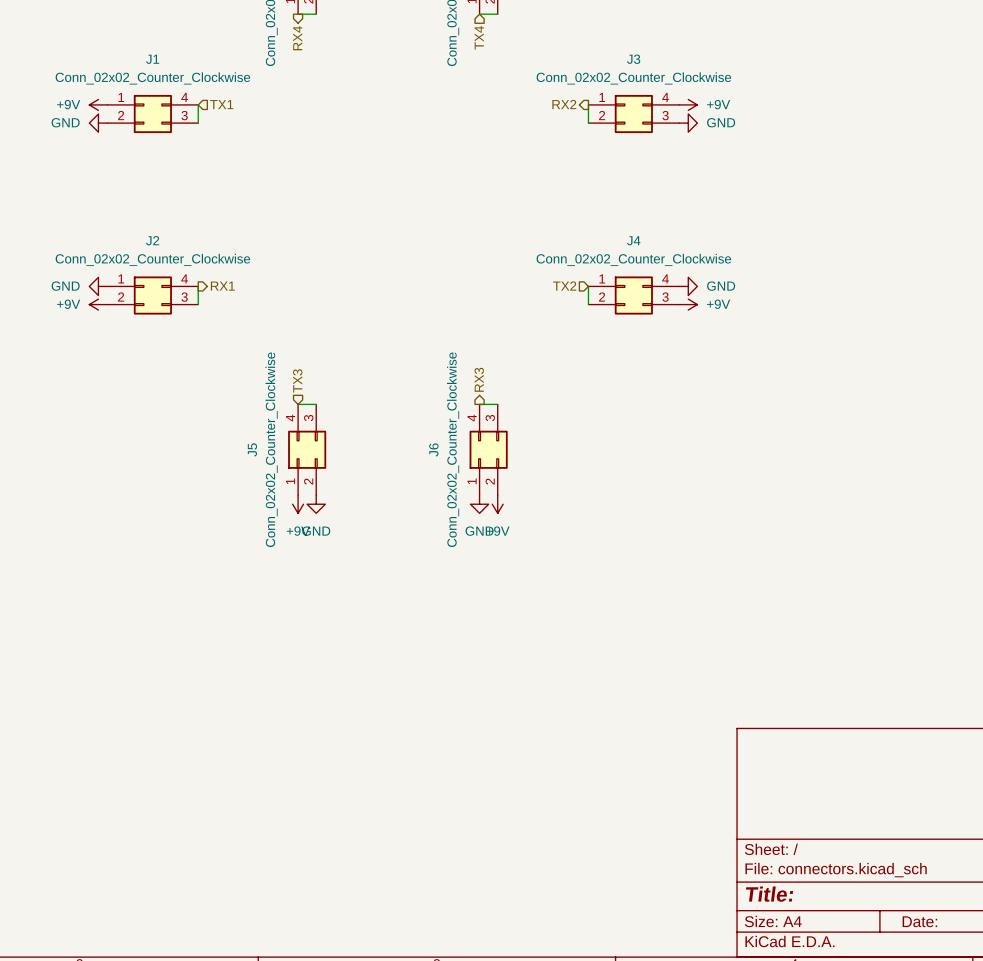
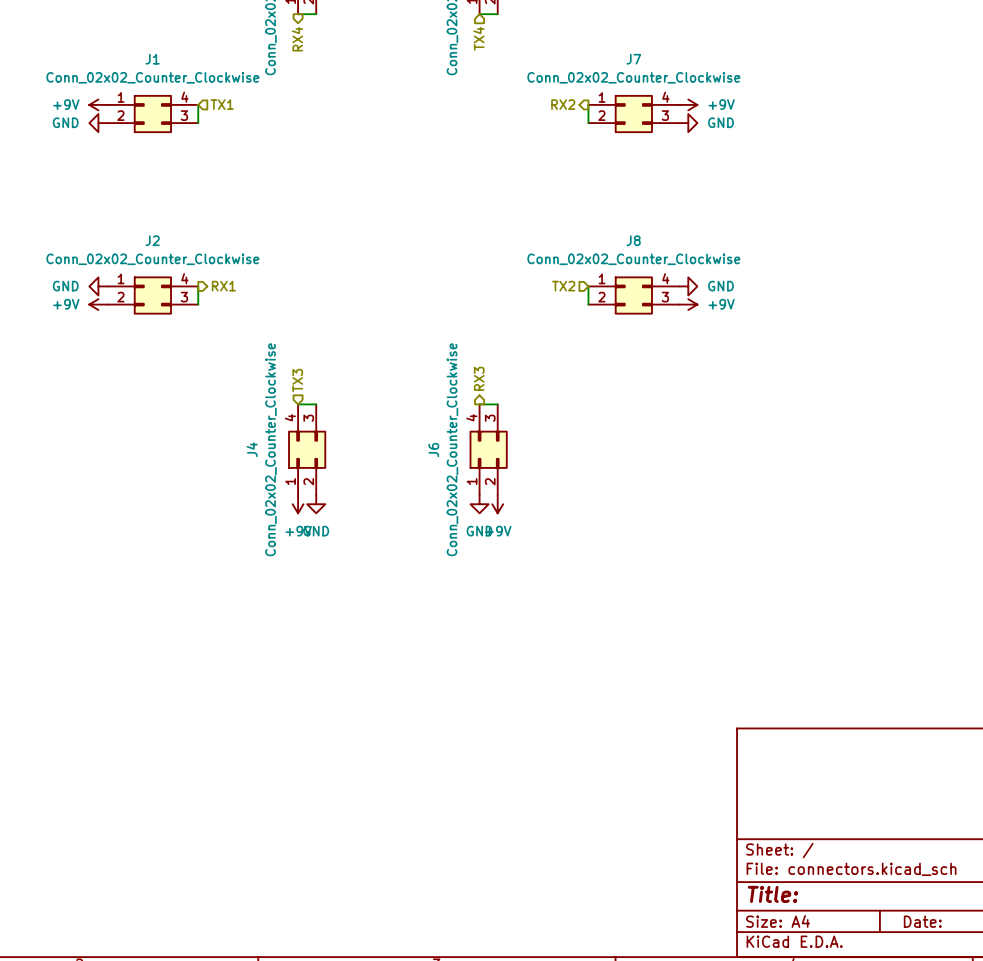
J3 name: J3 (633, 59) -> J7 (633, 59)
J4 name: J4 (633, 240) -> J8 (633, 240)
J5 name: J5 (252, 449) -> J4 (252, 449)

